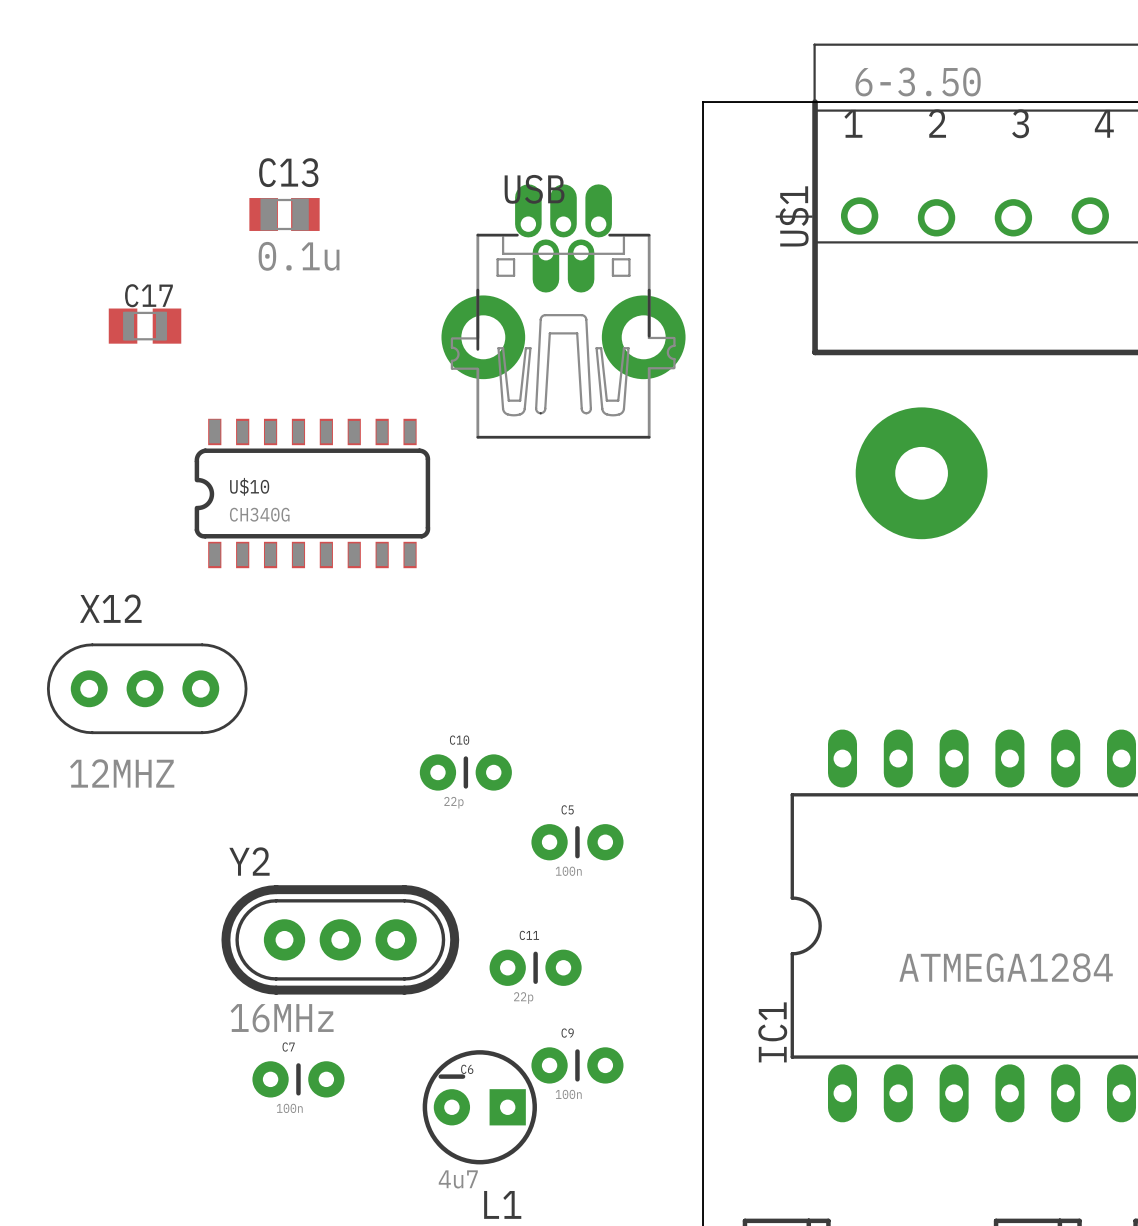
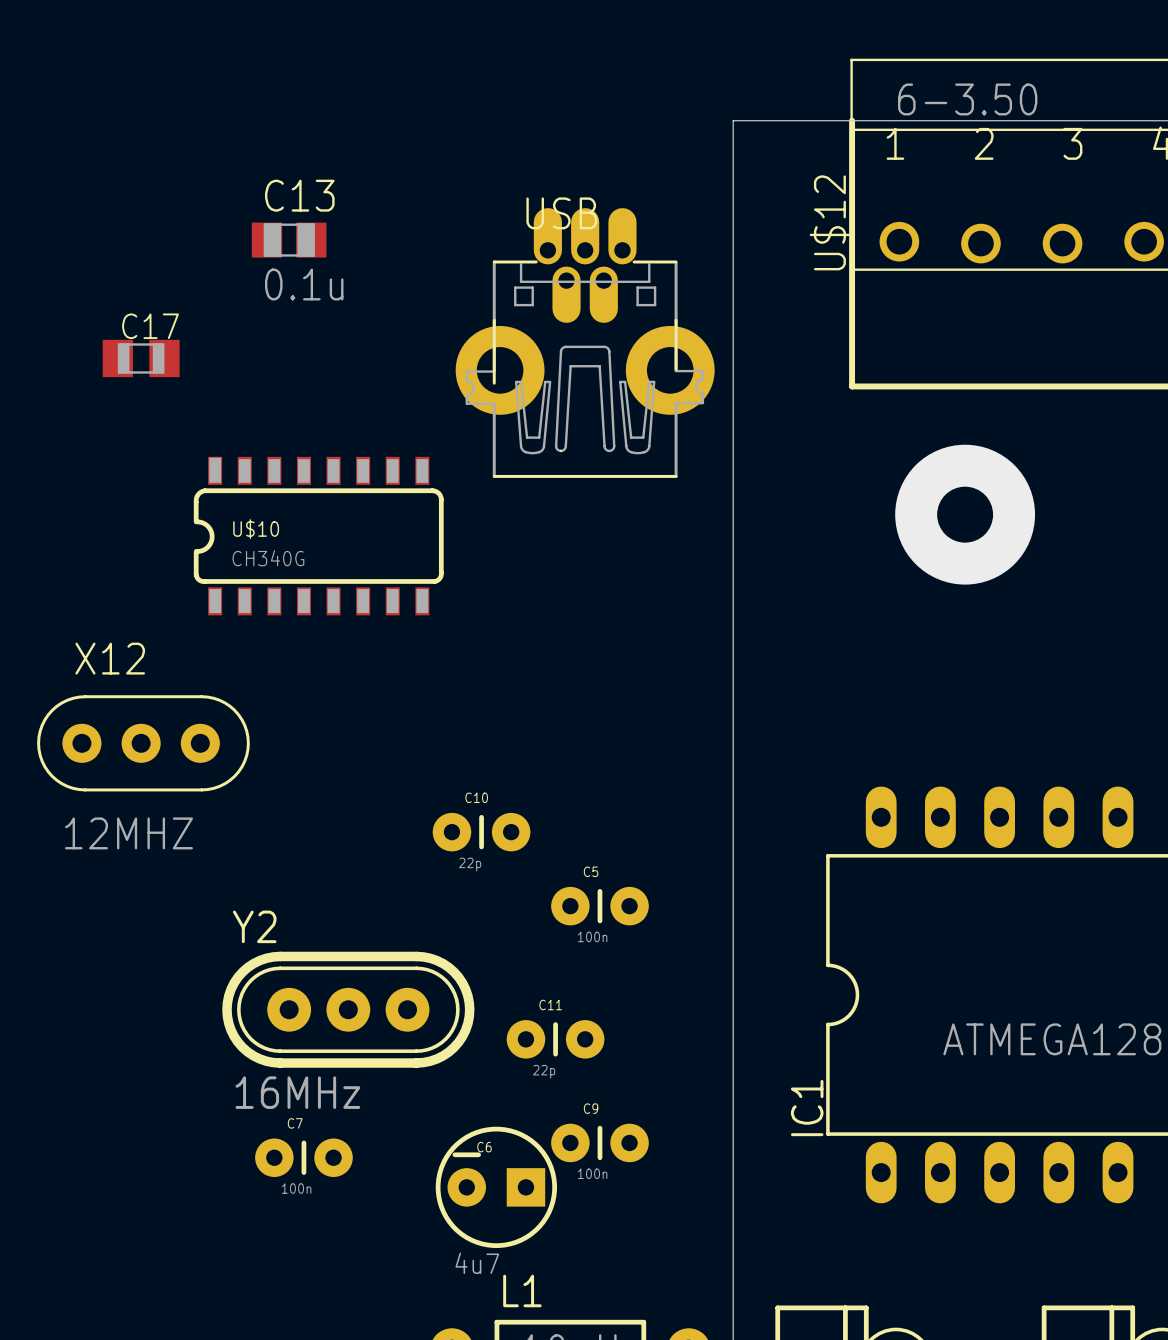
U$1 name: U$1 (794, 216) -> U$12 (829, 222)

